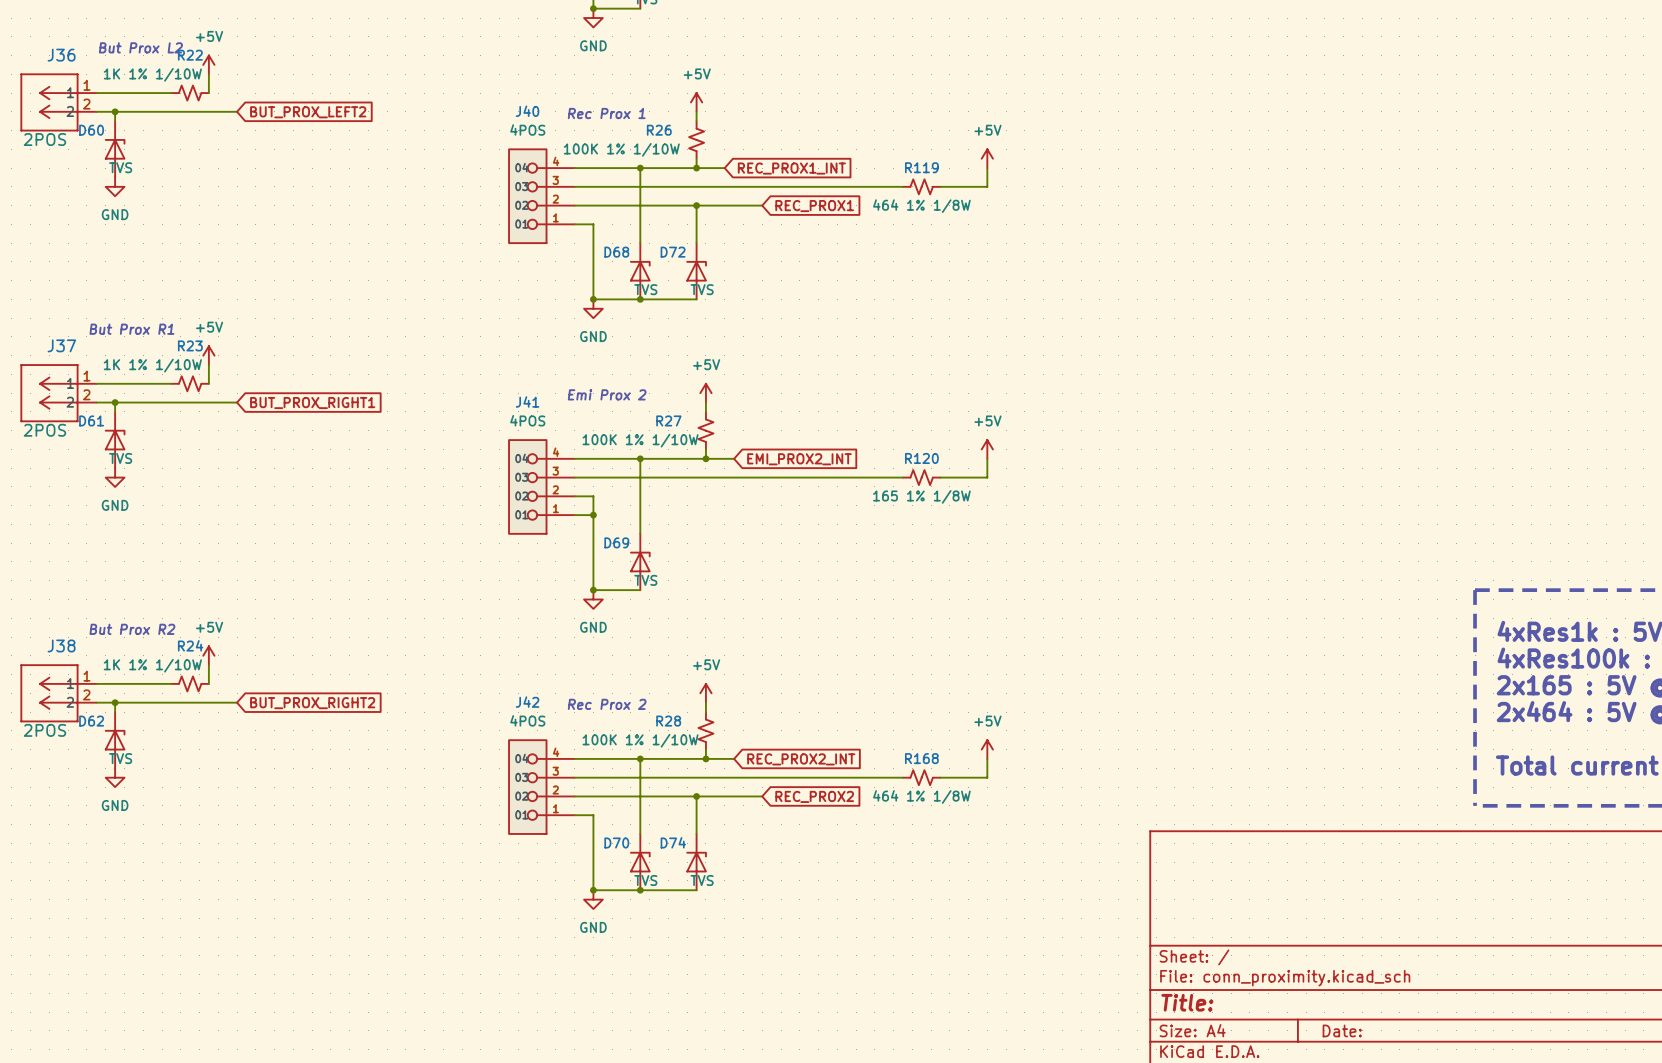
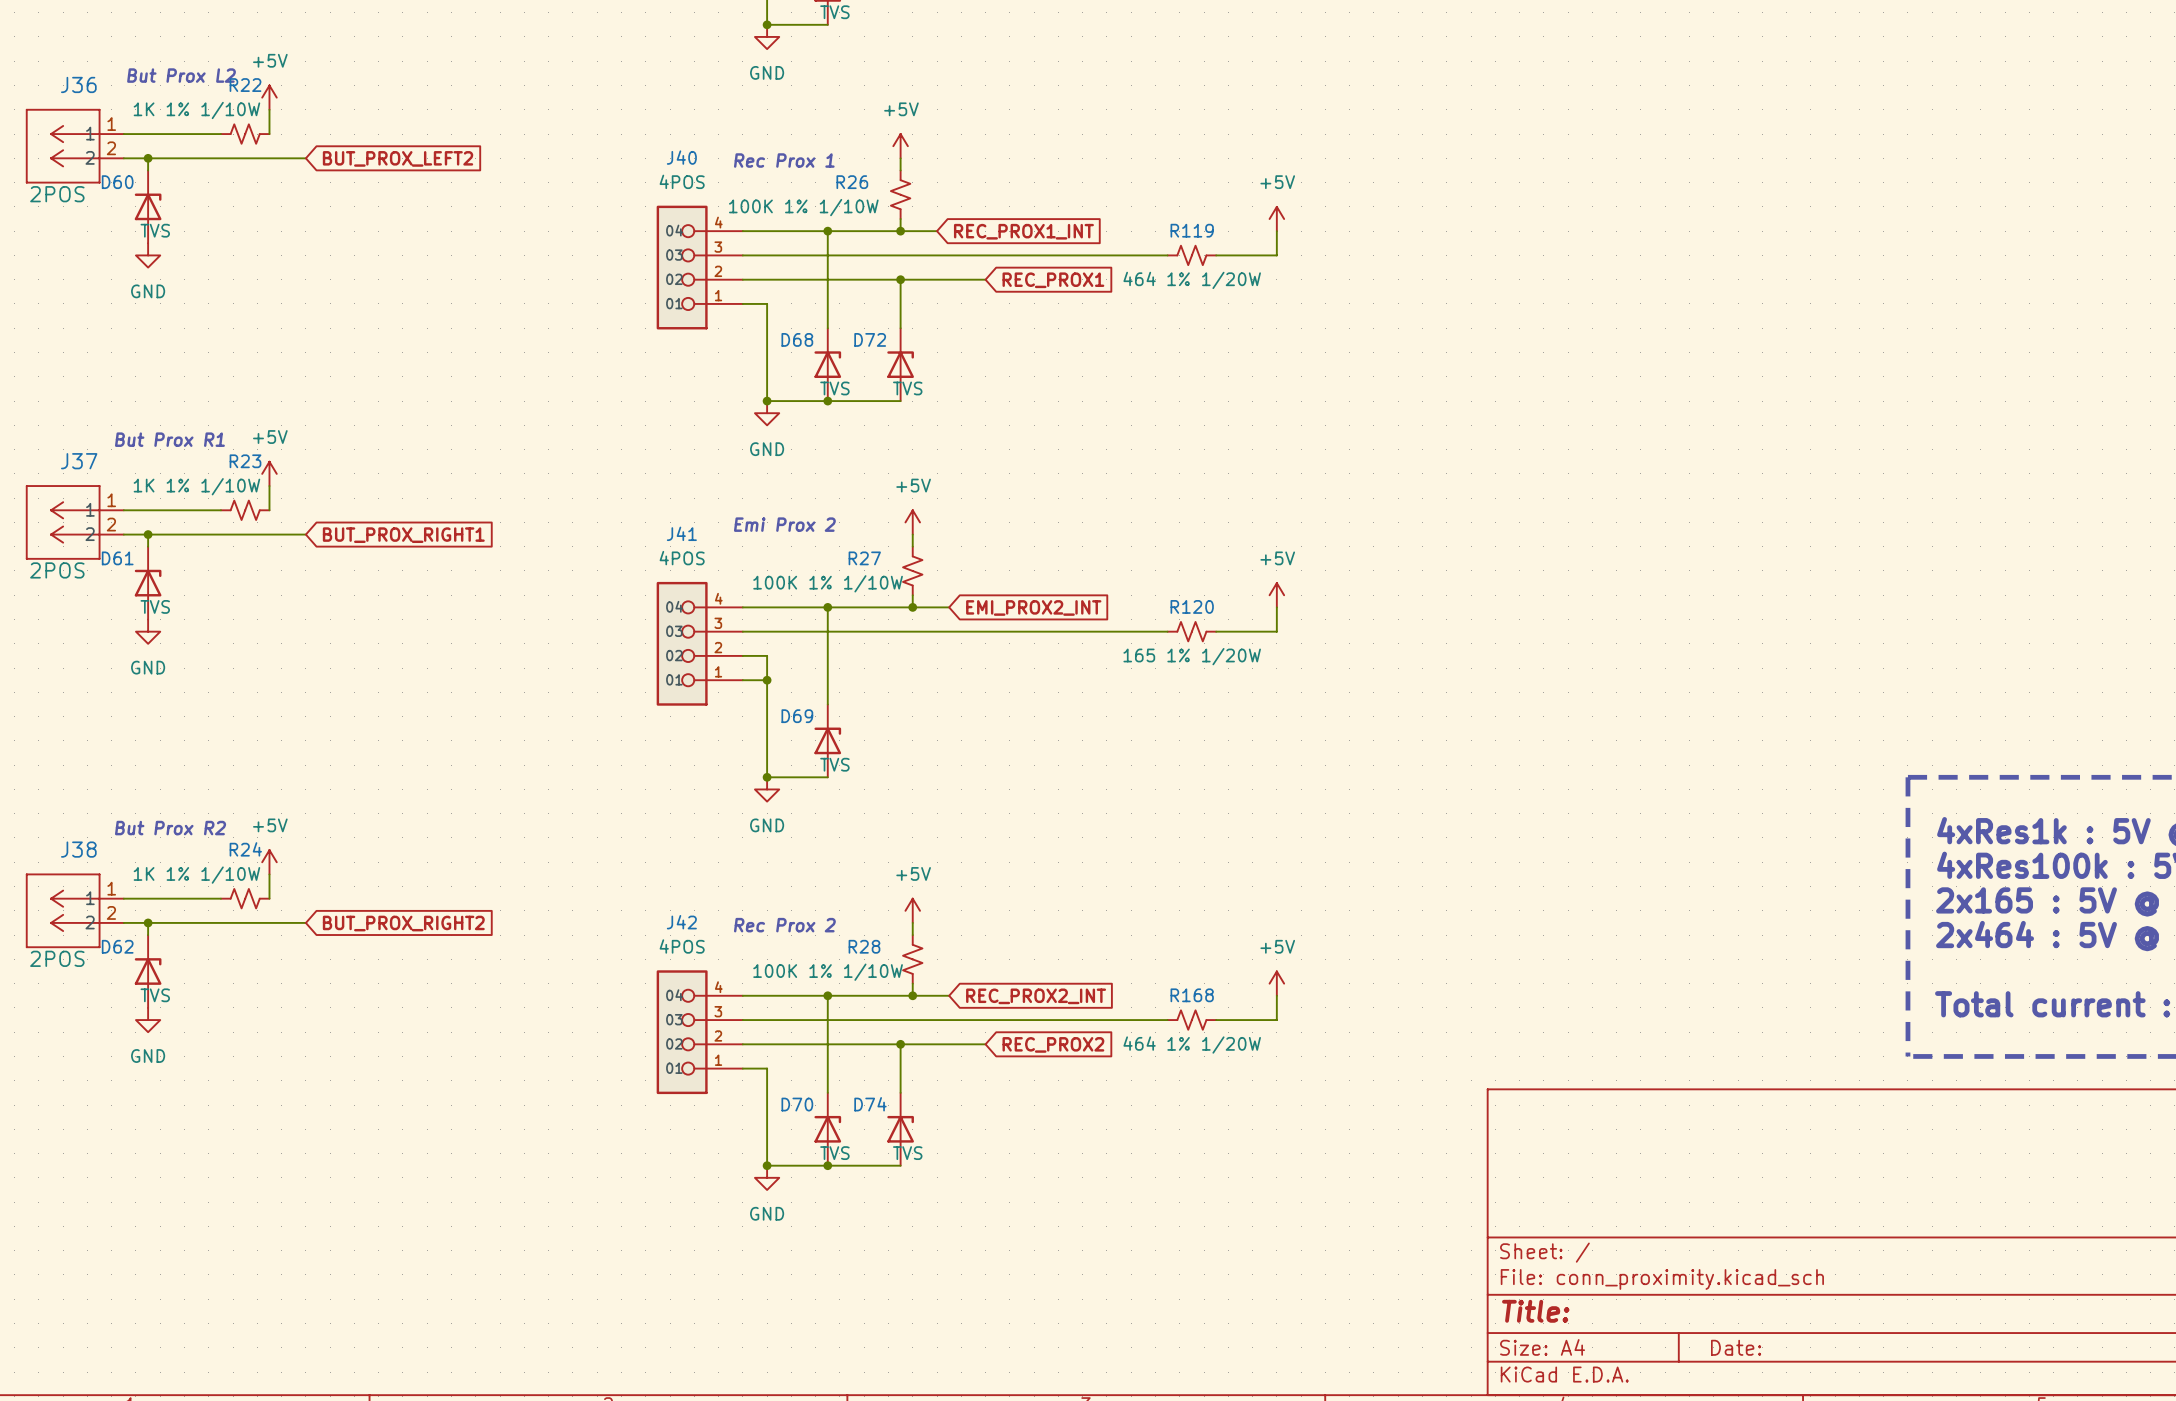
R119 value: 464 1% 1/8W (921, 206) -> 464 1% 1/20W (1192, 280)
R120 value: 165 1% 1/8W (921, 496) -> 165 1% 1/20W (1192, 656)
R168 value: 464 1% 1/8W (921, 797) -> 464 1% 1/20W (1192, 1045)

